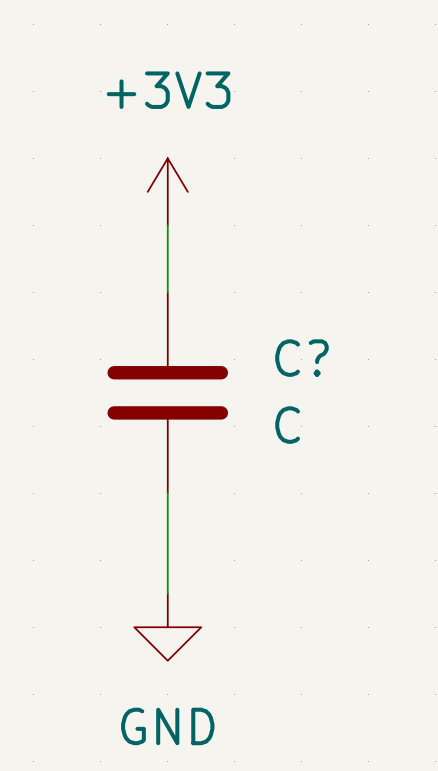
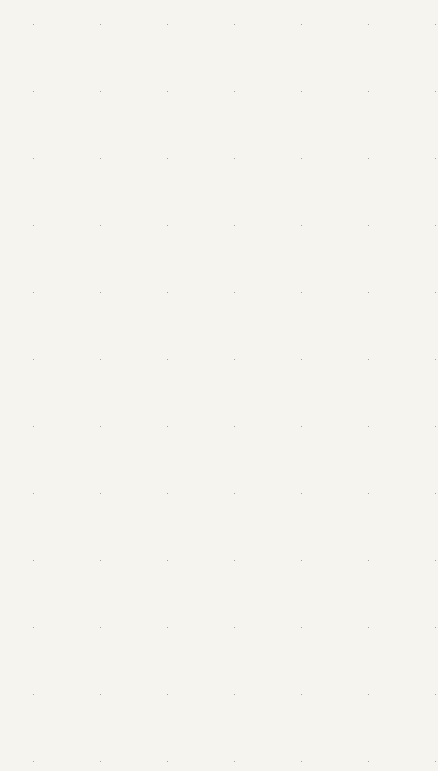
power symbol: +3V3 (167, 191) -> none
wire: (167, 225) (167, 292) -> none
C?: C (167, 392) -> none
wire: (167, 493) (167, 593) -> none
power symbol: GND (167, 627) -> none

